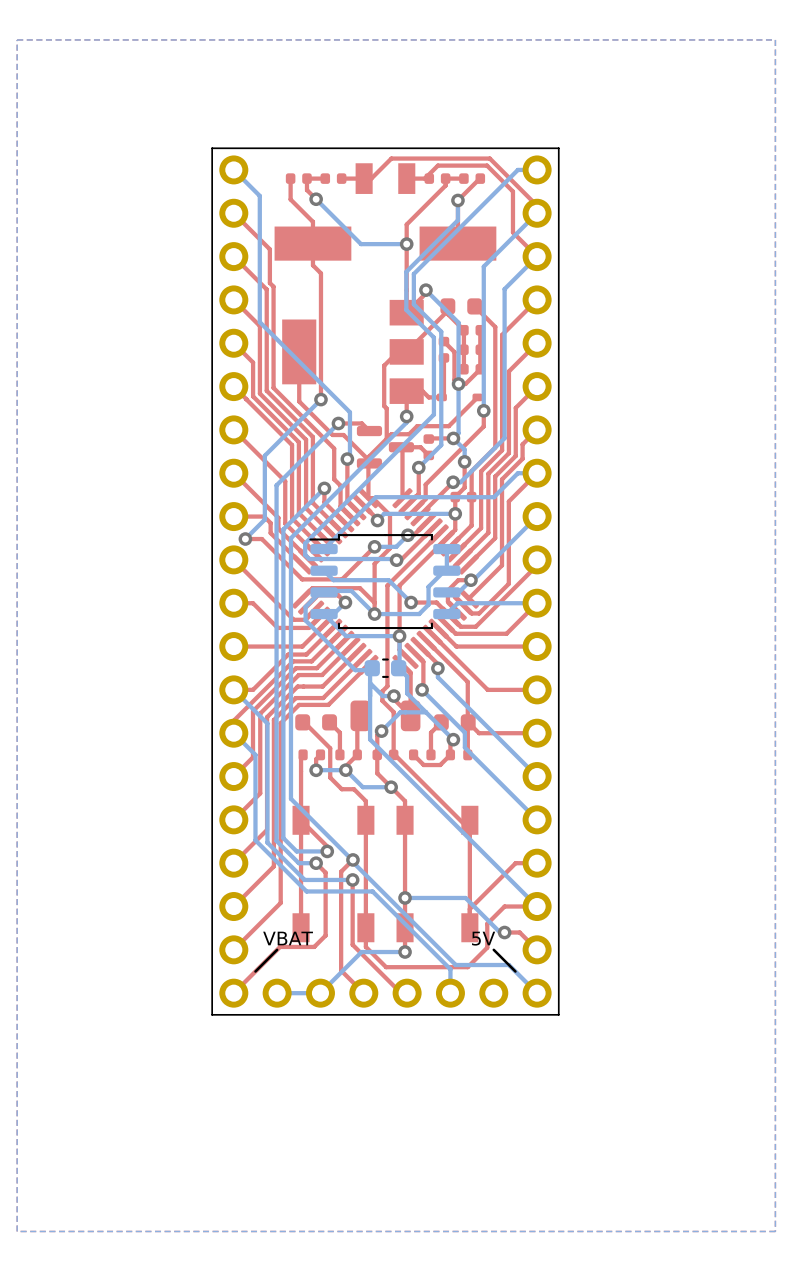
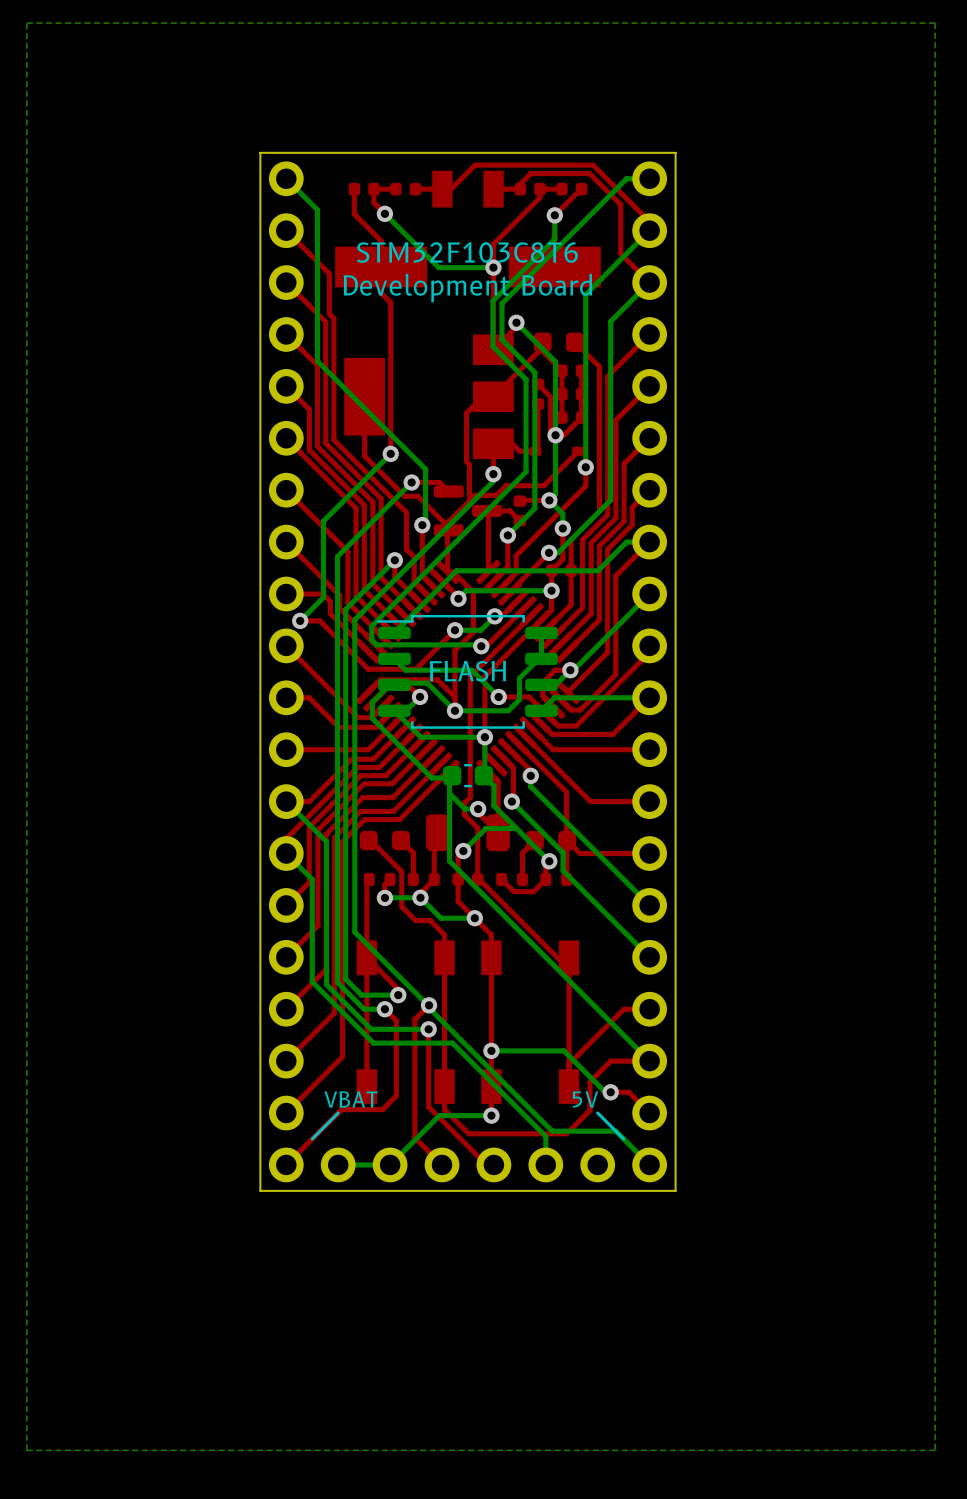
text: none -> STM32F103C8T6 (467, 252)
text: none -> Development Board (467, 287)
text: none -> FLASH (467, 671)

